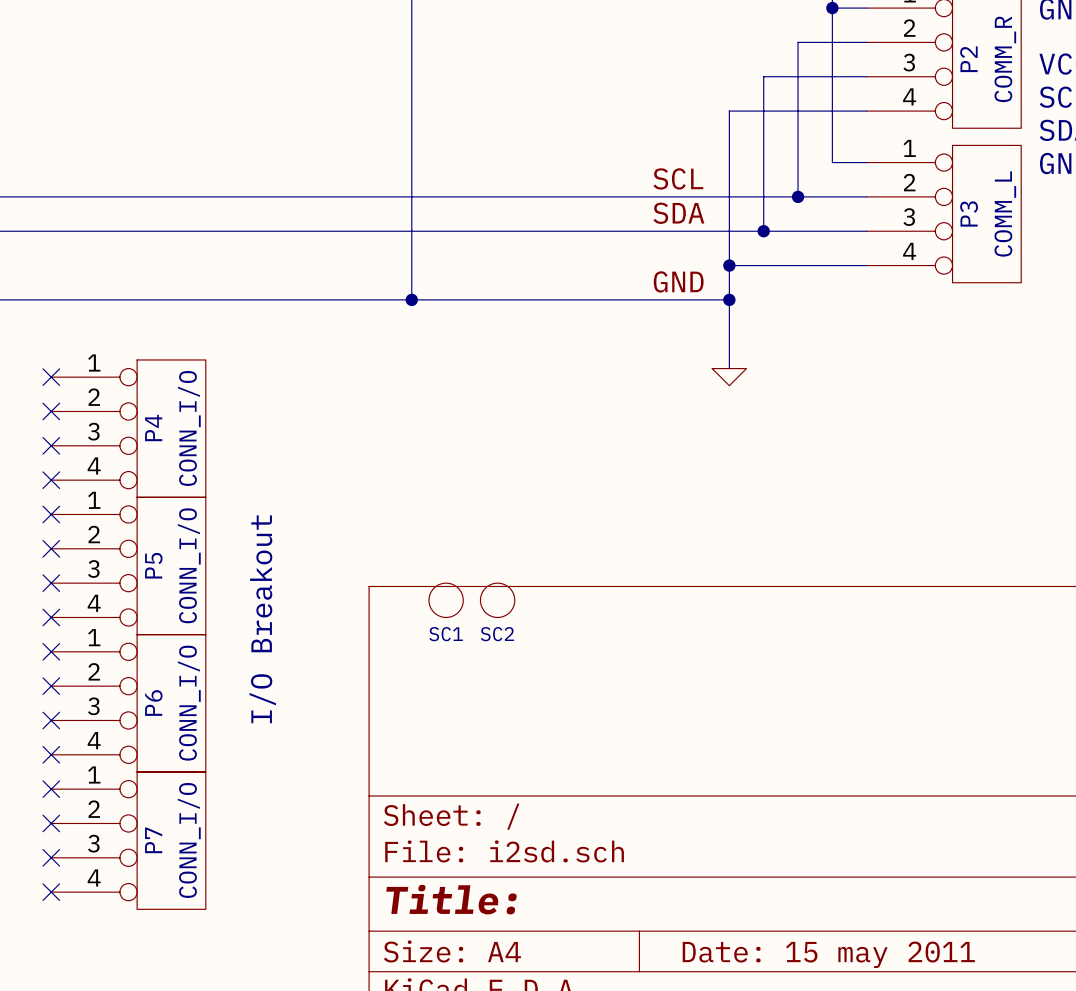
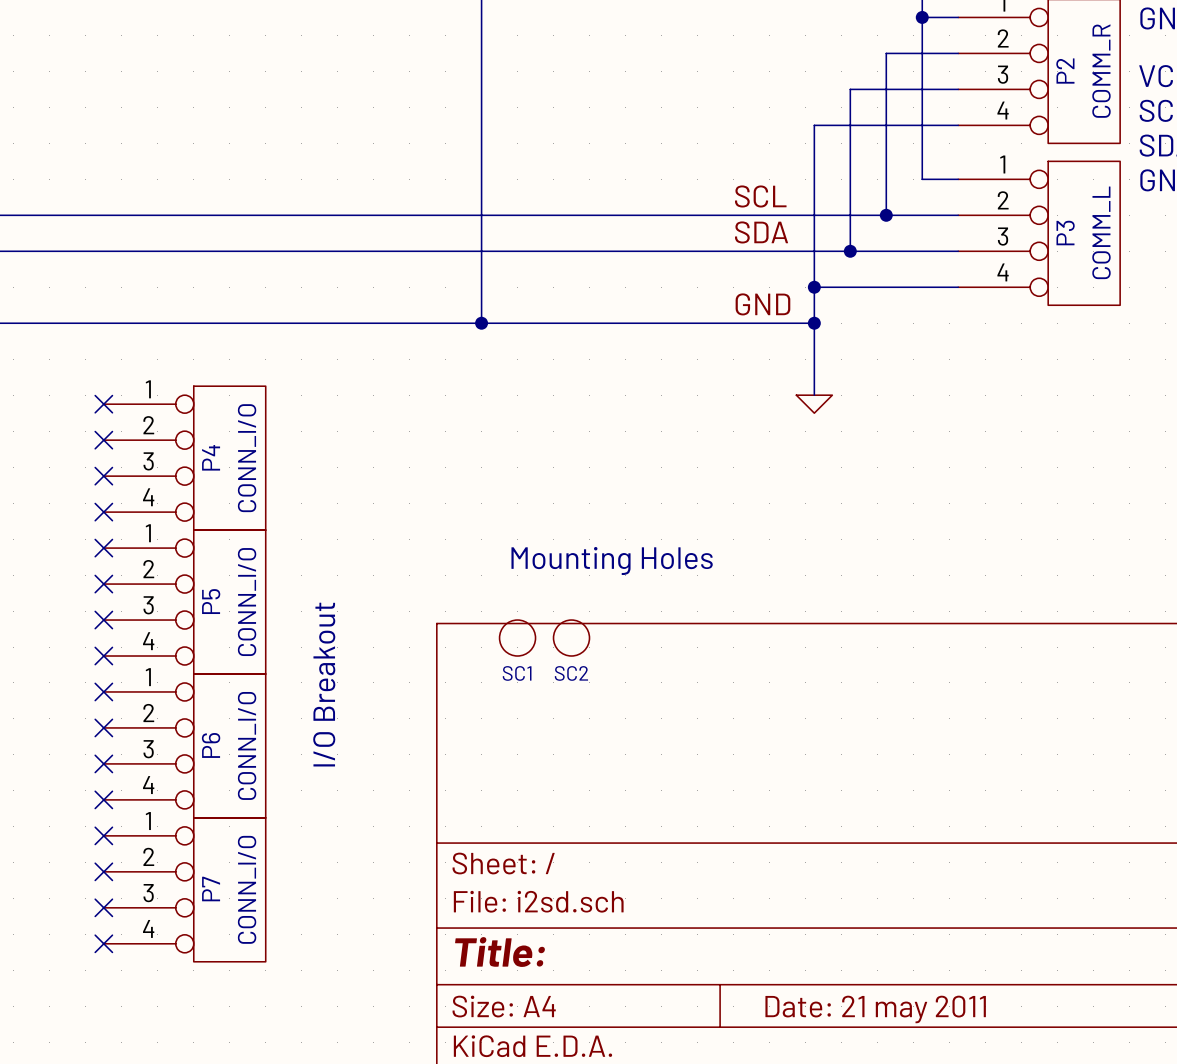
text: none -> Mounting Holes (612, 561)
title block: Date: 15 may 2011 (828, 954) -> Date: 21 may 2011 (875, 1009)

